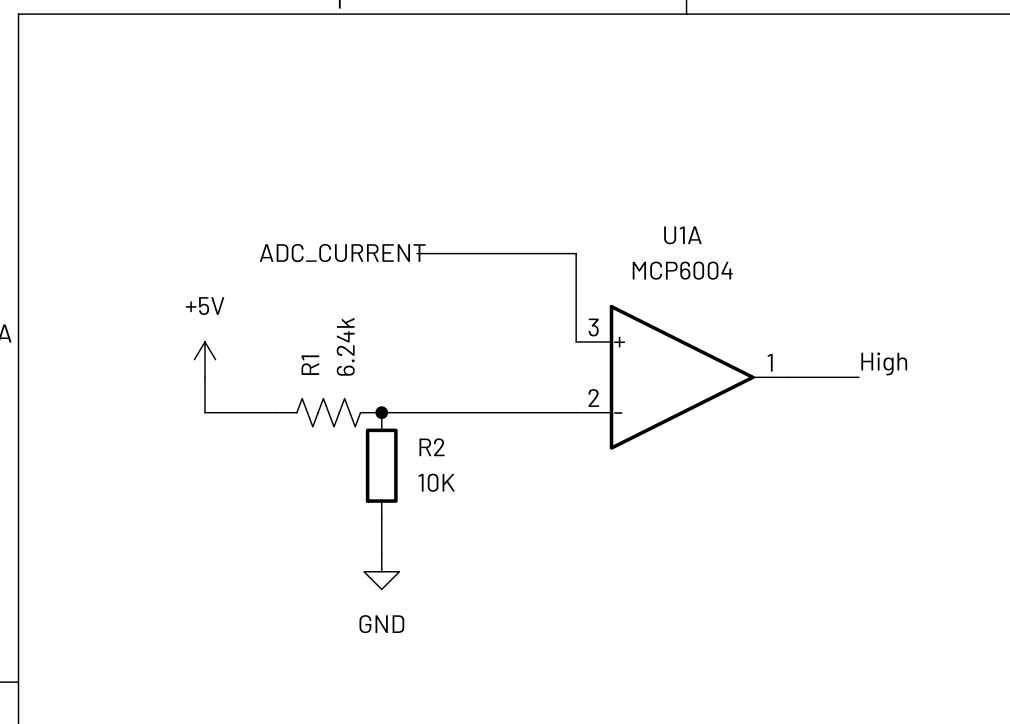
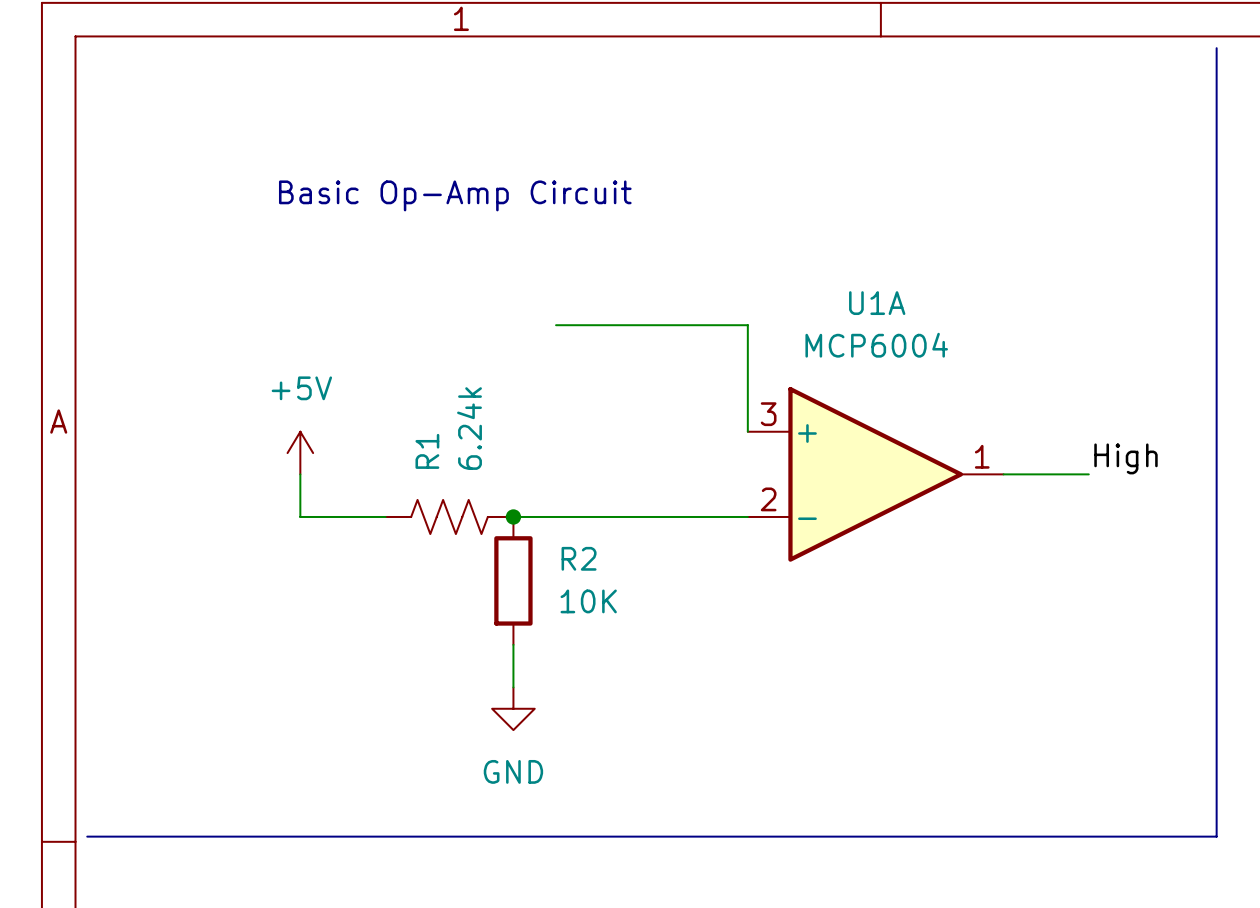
line: none -> (1216, 48) (1216, 836) (87, 836)
text: none -> Basic Op-Amp Circuit (455, 195)
text: ADC_CURRENT (342, 253) -> none

